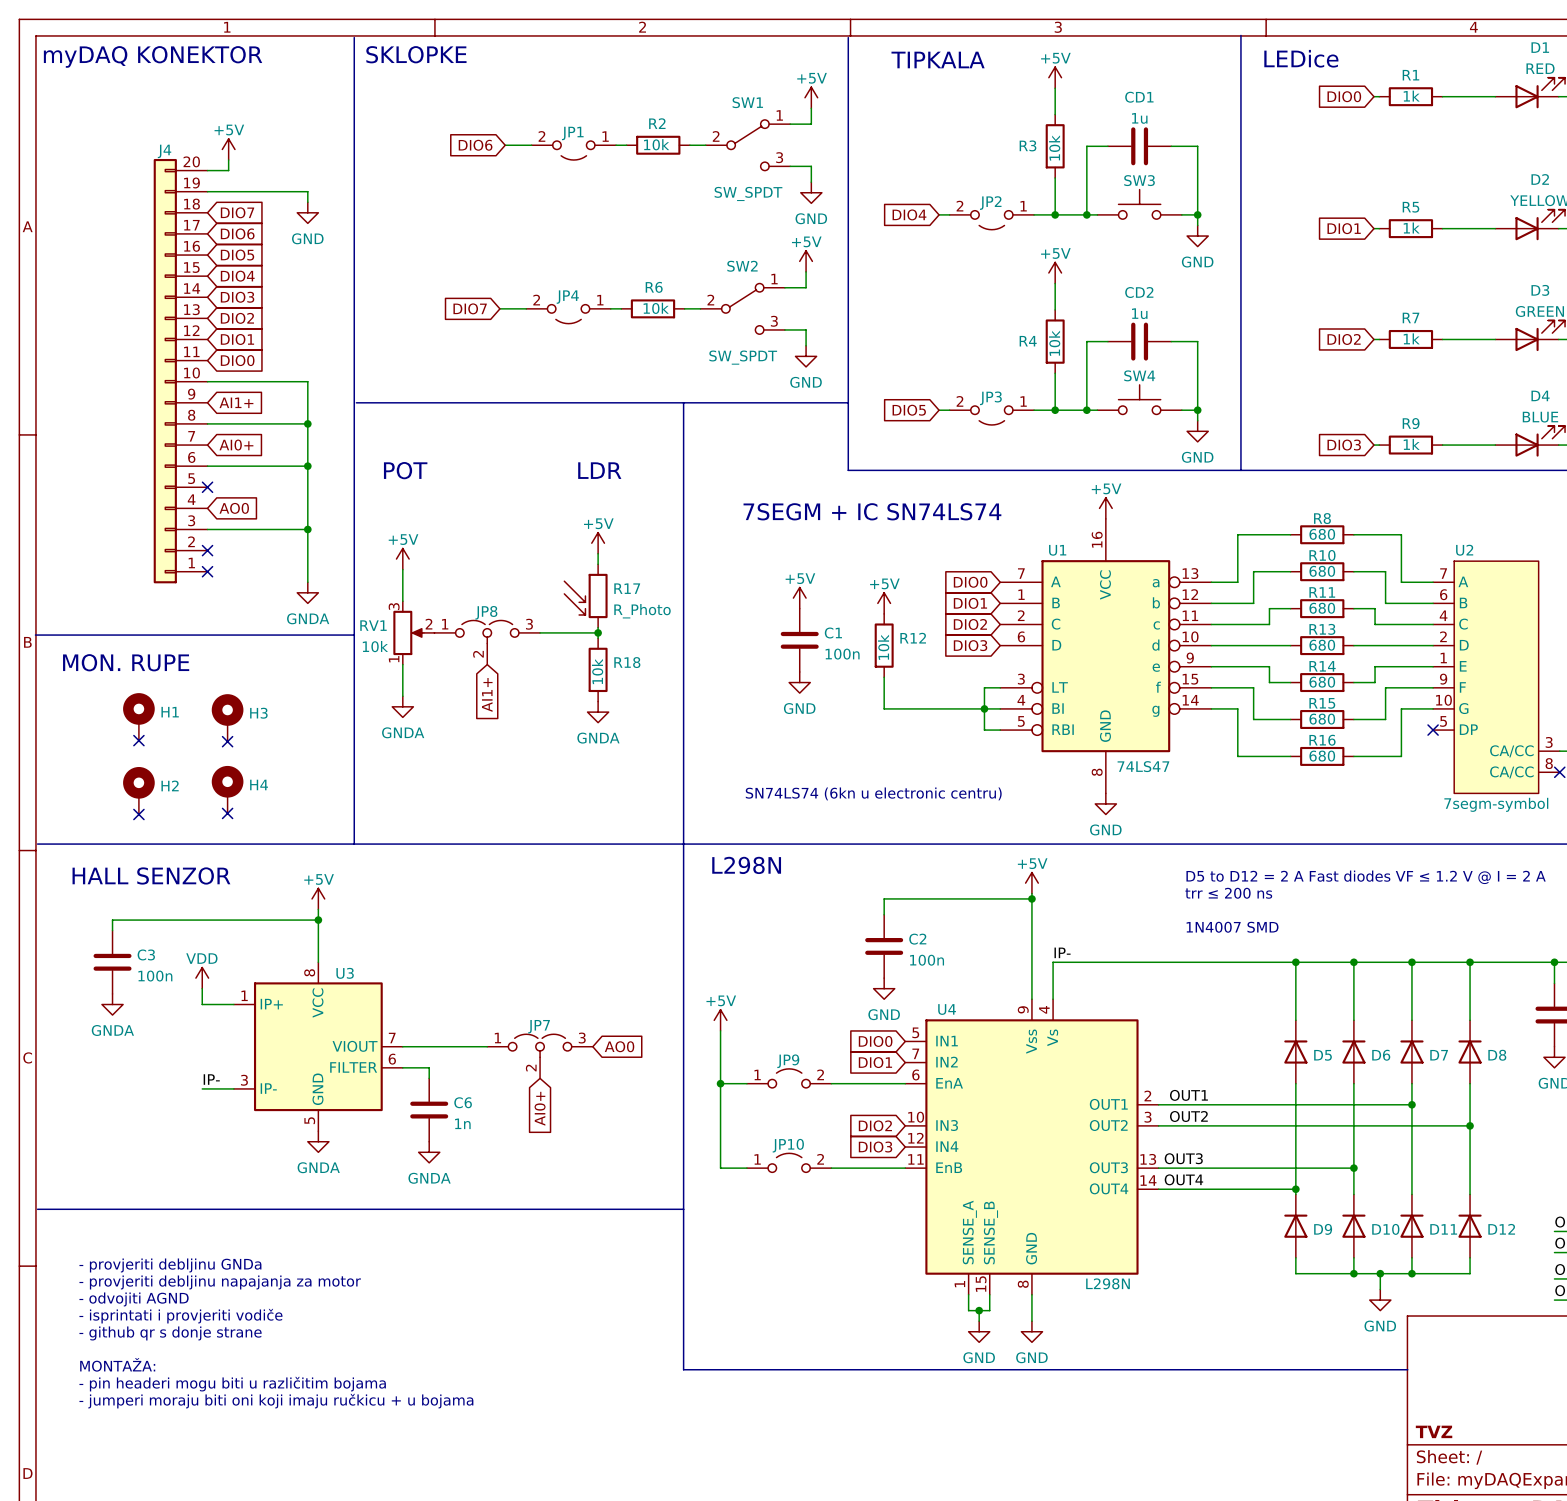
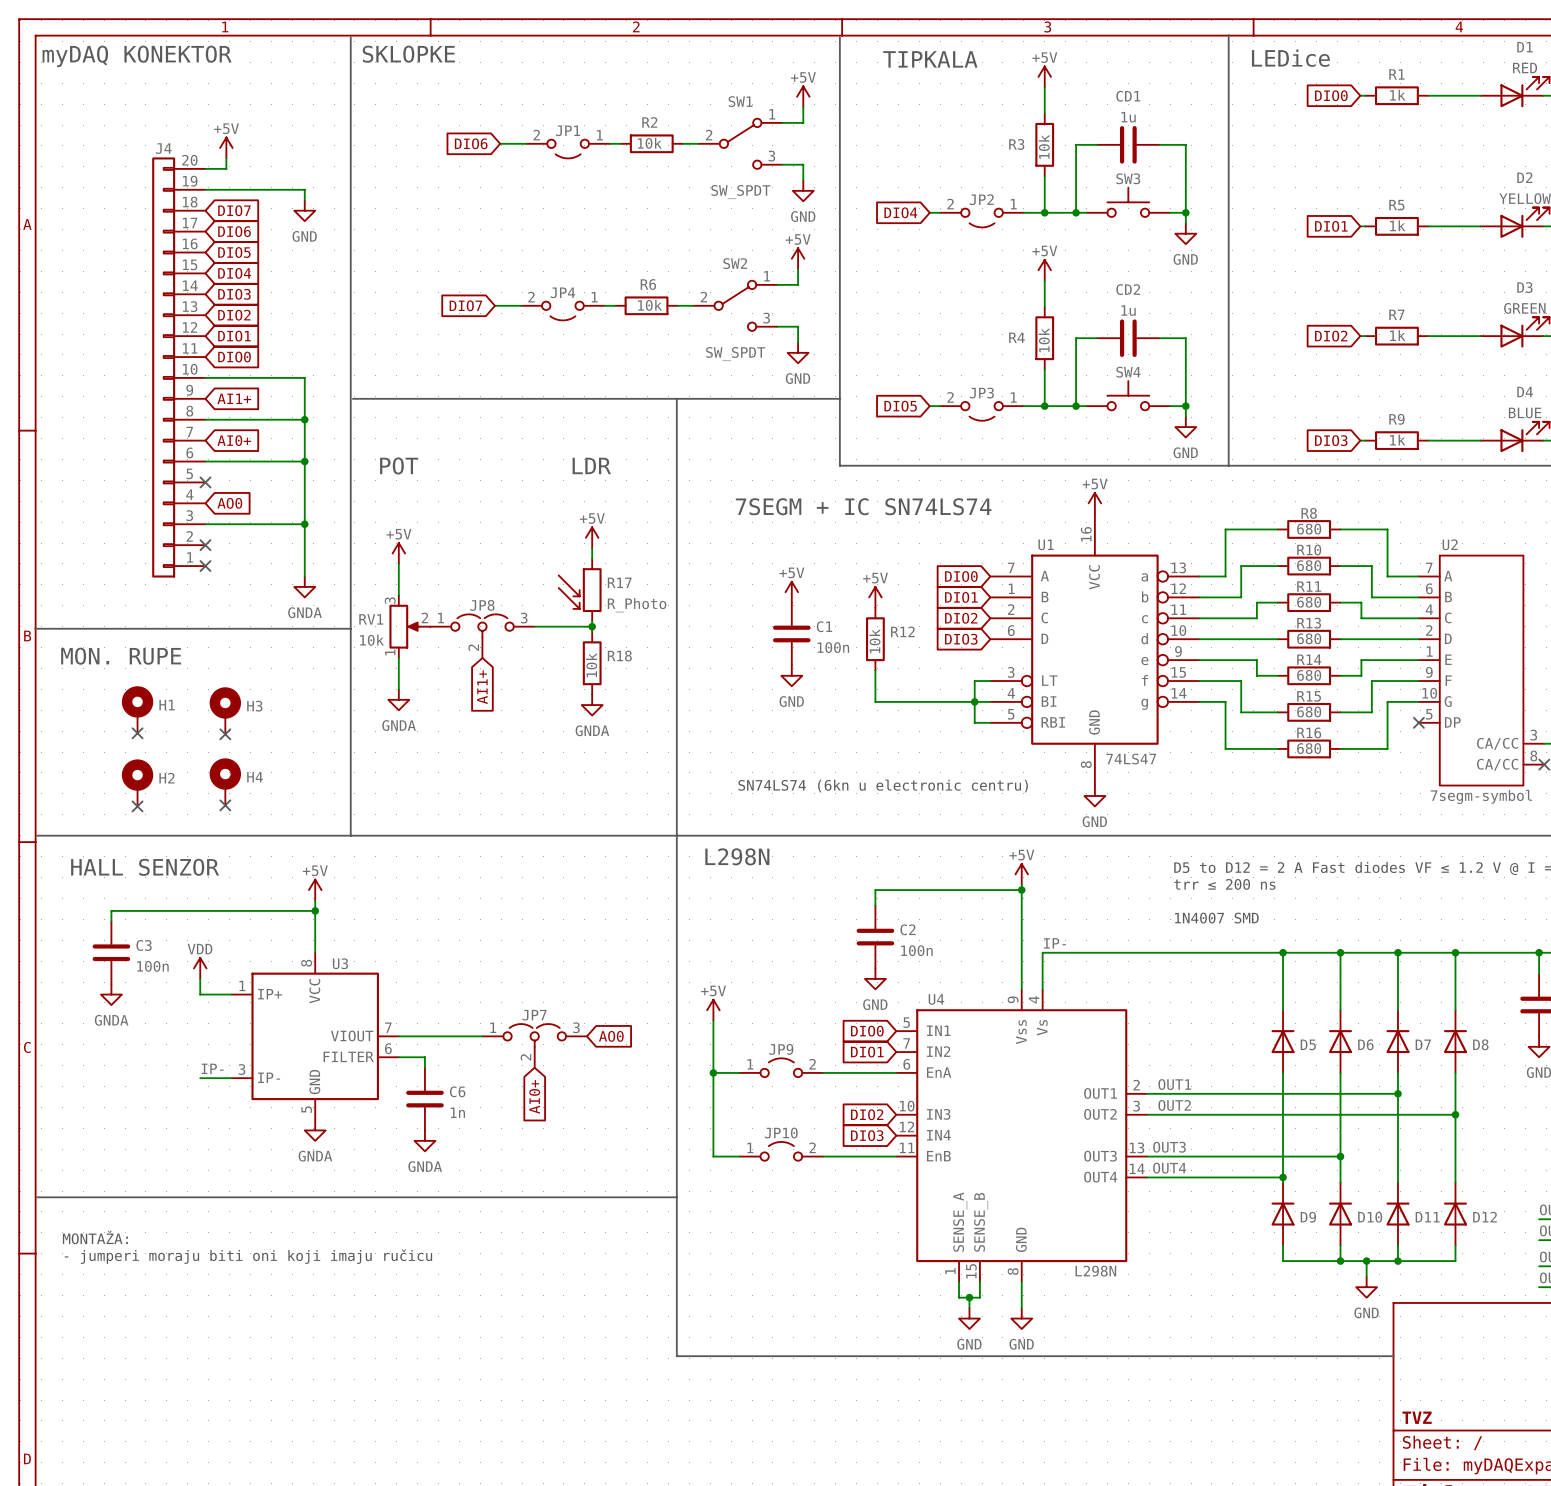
text: - provjeriti debljinu GNDa (170, 1265) -> none
text: none -> - jumperi moraju biti oni koji imaju ručicu (248, 1256)
text: - provjeriti debljinu napajanja za motor (220, 1282) -> none
text: - odvojiti AGND (134, 1299) -> none
text: - isprintati i provjeriti vodiče (180, 1316) -> none
text: - github qr s donje strane (170, 1333) -> none
text position: MONTAŽA: (117, 1364) -> MONTAŽA: (95, 1237)
text: - pin headeri mogu biti u različitim bojama (232, 1384) -> none
text: - jumperi moraju biti oni koji imaju ručkicu + u bojama (276, 1401) -> none

